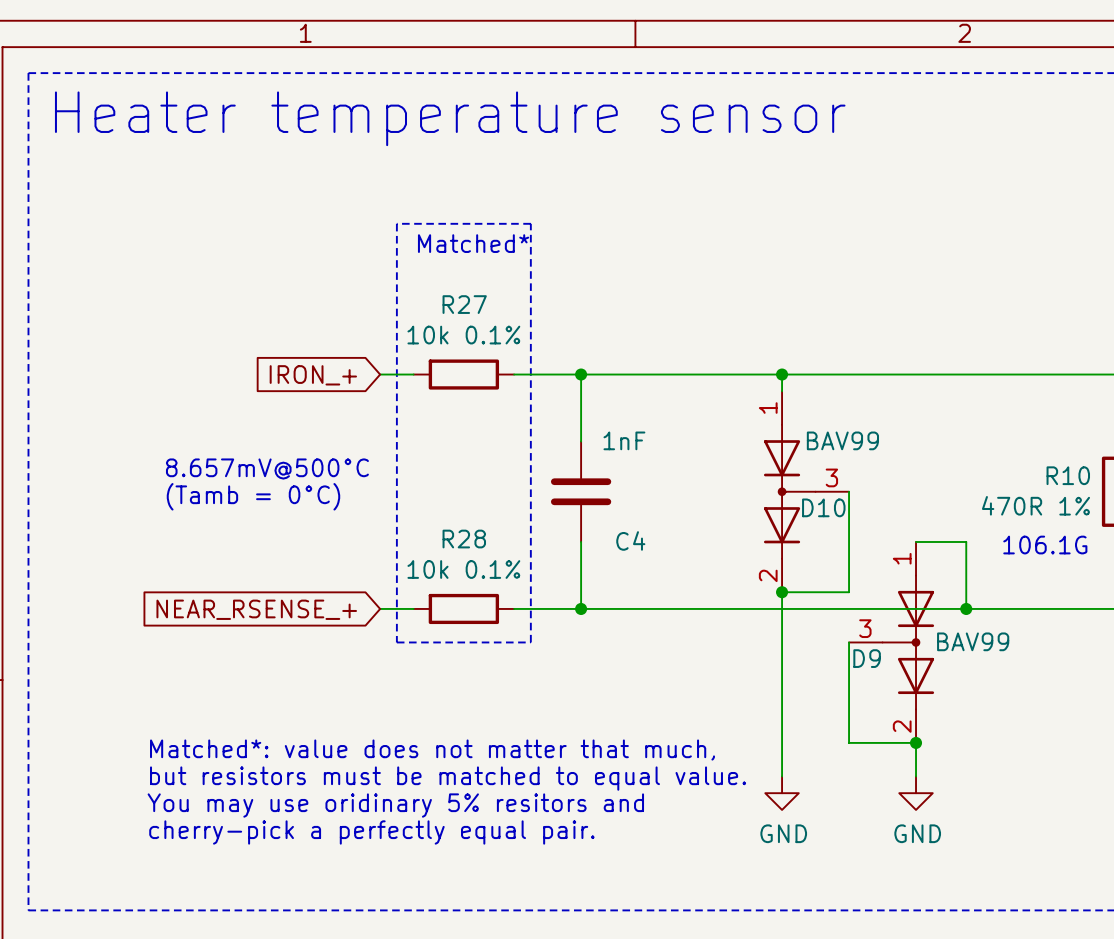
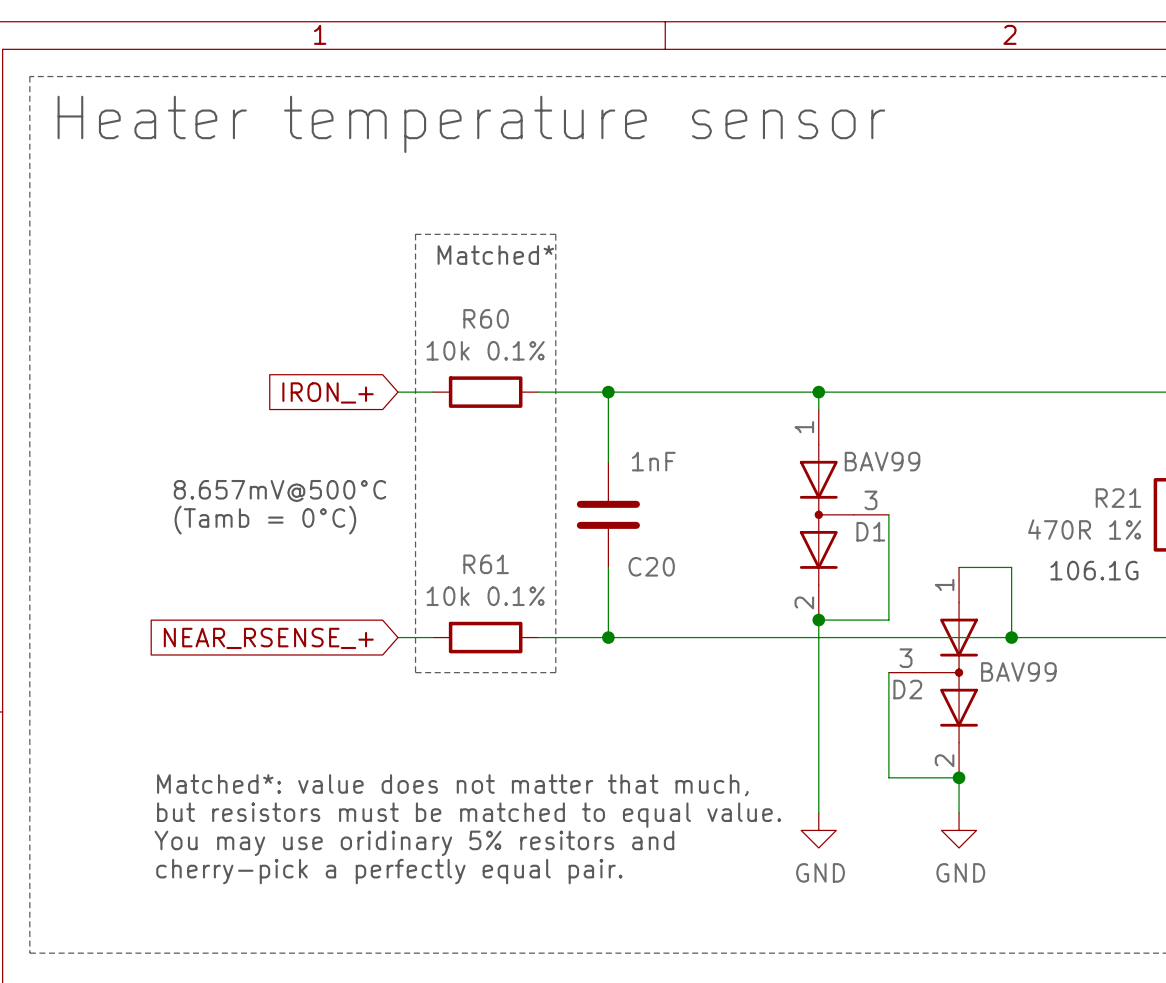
R27 name: R27 (464, 304) -> R60 (486, 318)
R10 name: R10 (1068, 475) -> R21 (1118, 498)
D10 name: D10 (823, 507) -> D1 (870, 531)
R28 name: R28 (464, 539) -> R61 (486, 564)
C4 name: C4 (630, 540) -> C20 (651, 566)
D9 name: D9 (867, 658) -> D2 (907, 689)

